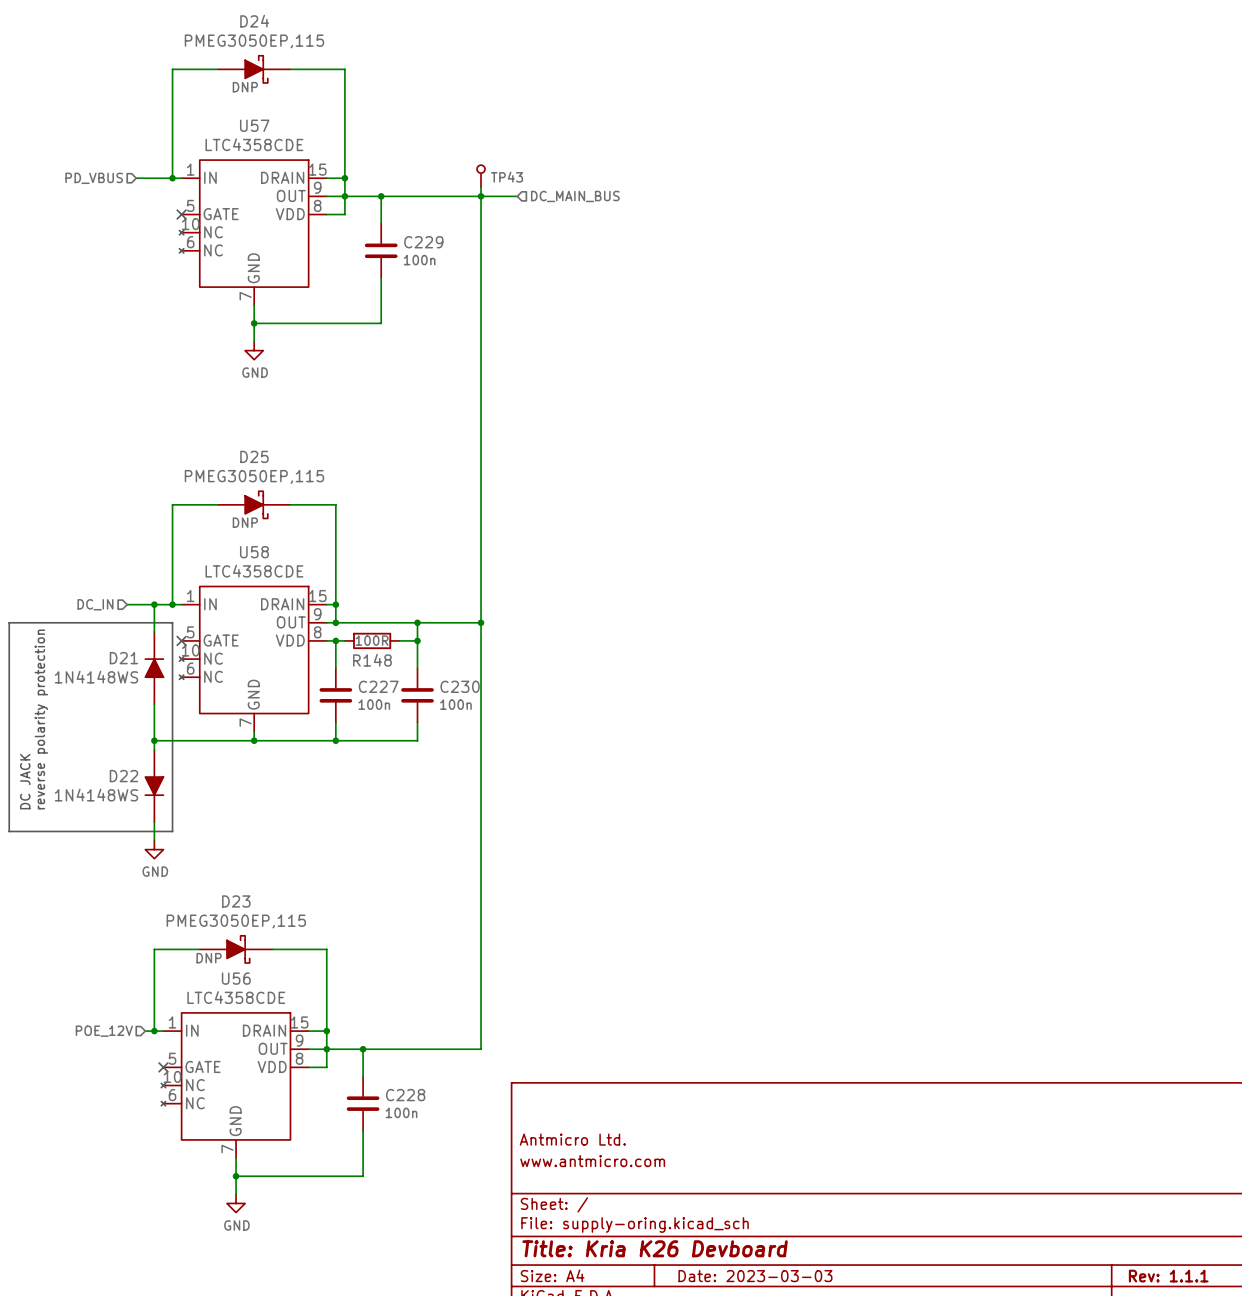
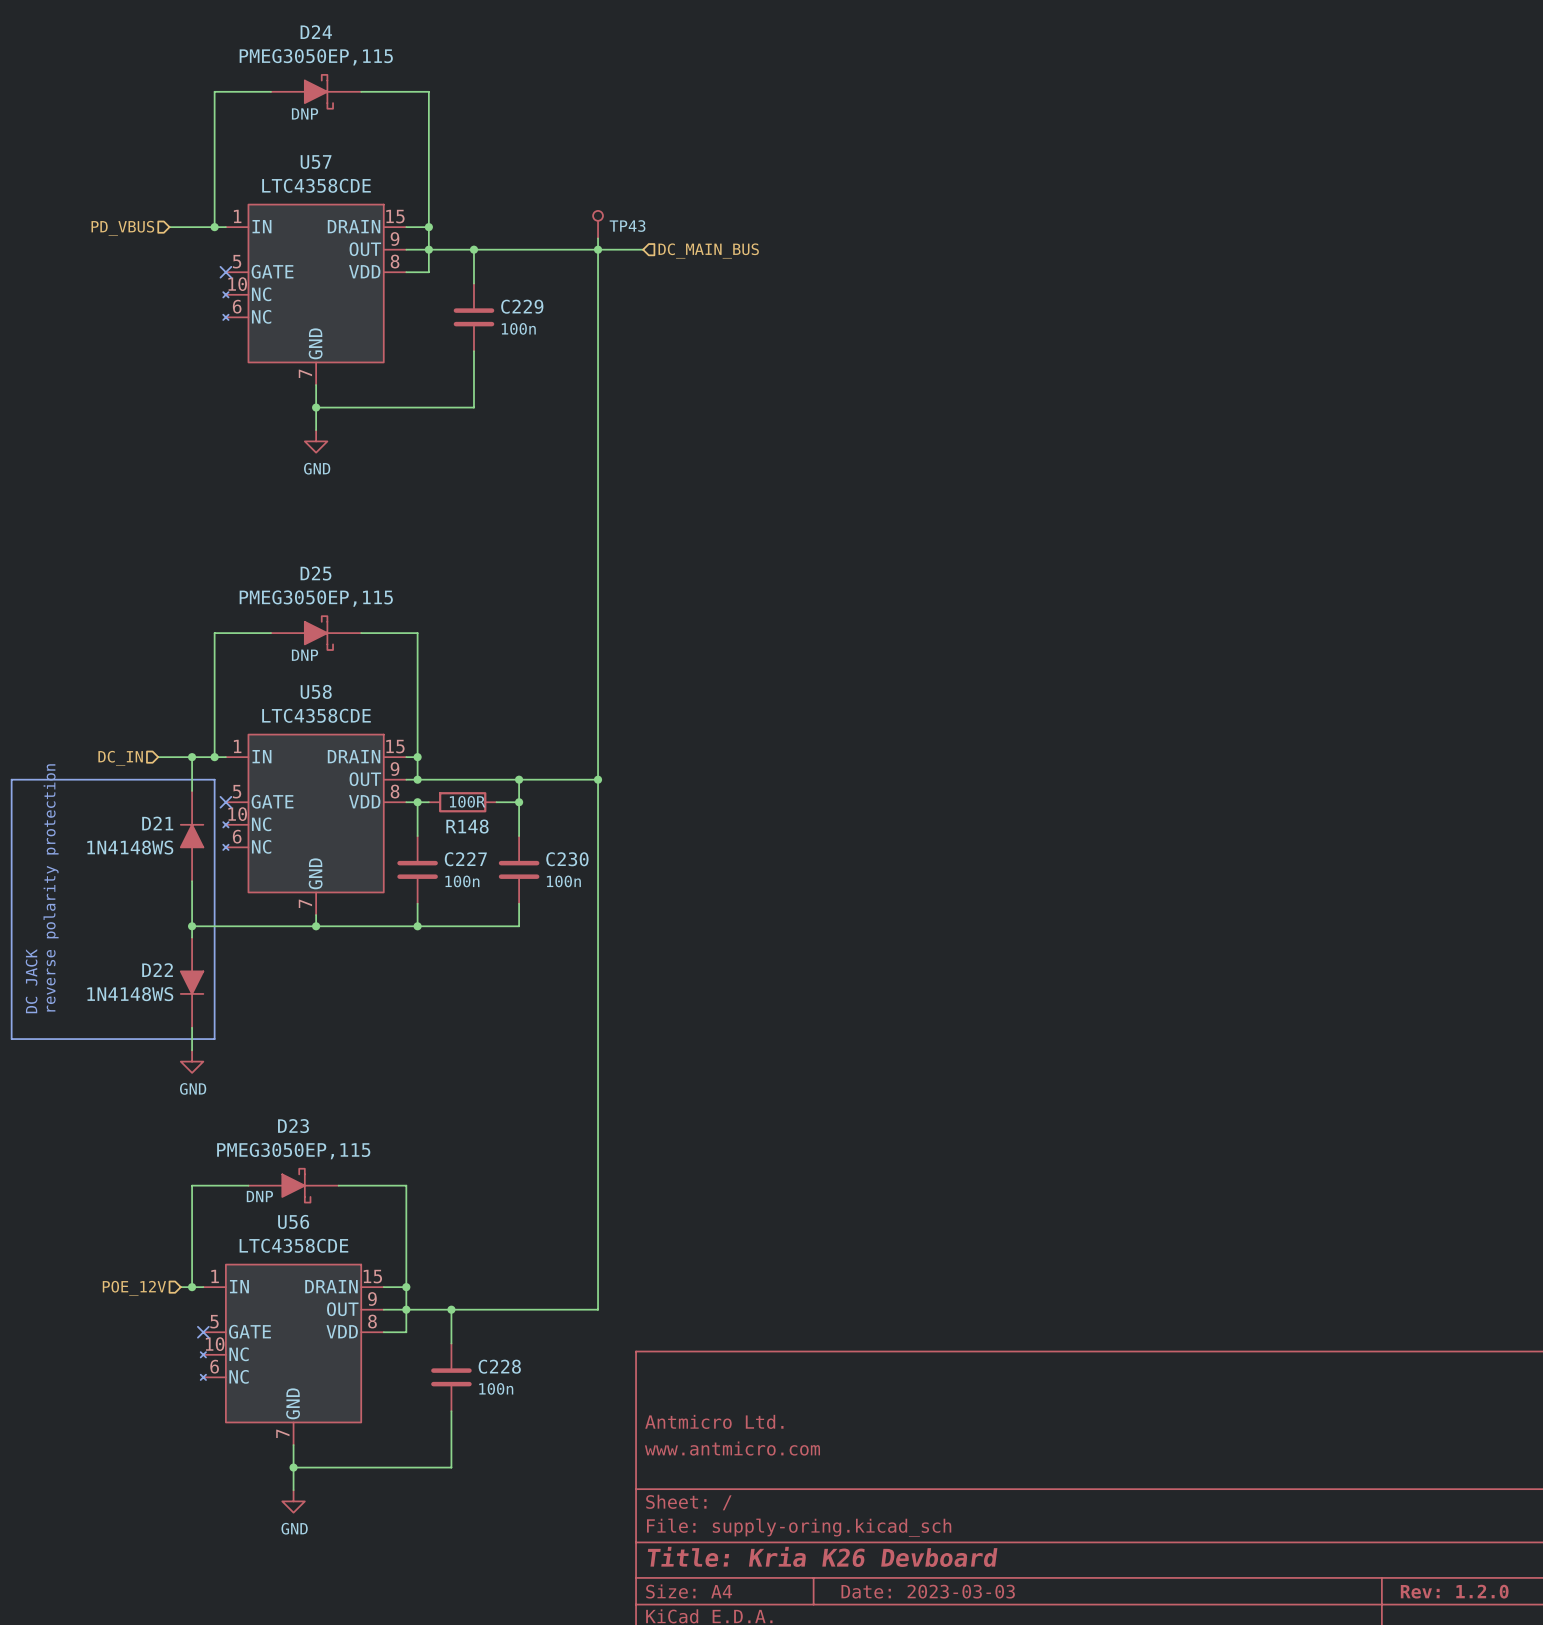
title block: Rev: 1.1.1 (1168, 1276) -> Rev: 1.2.0 (1454, 1591)

